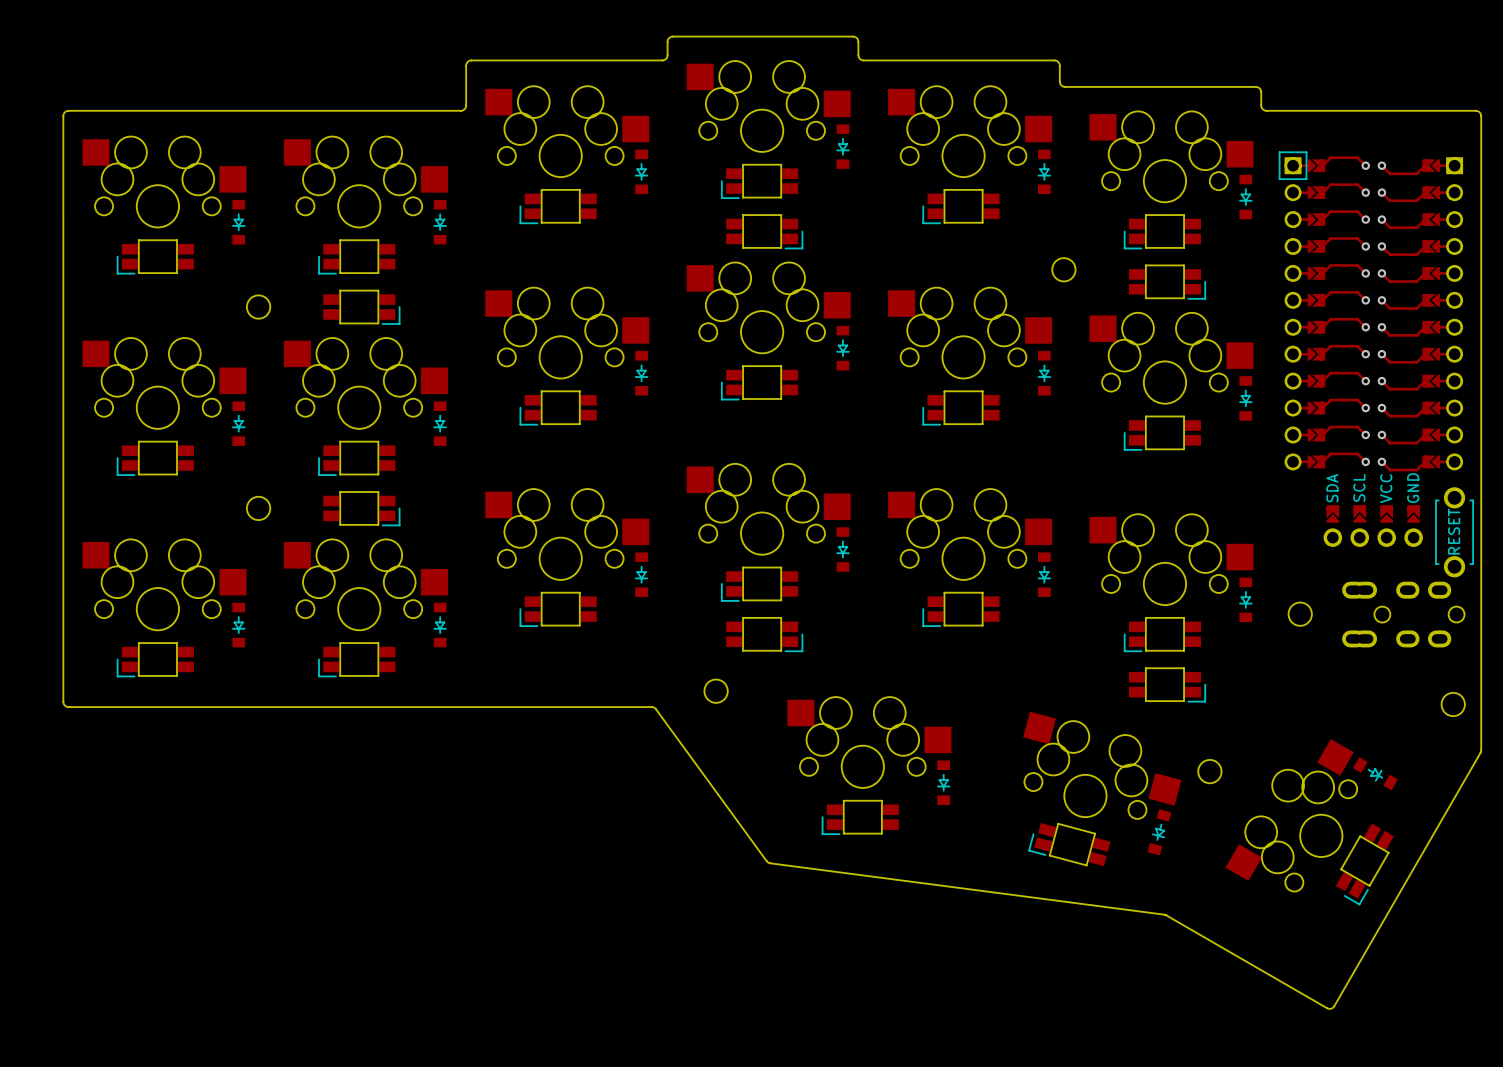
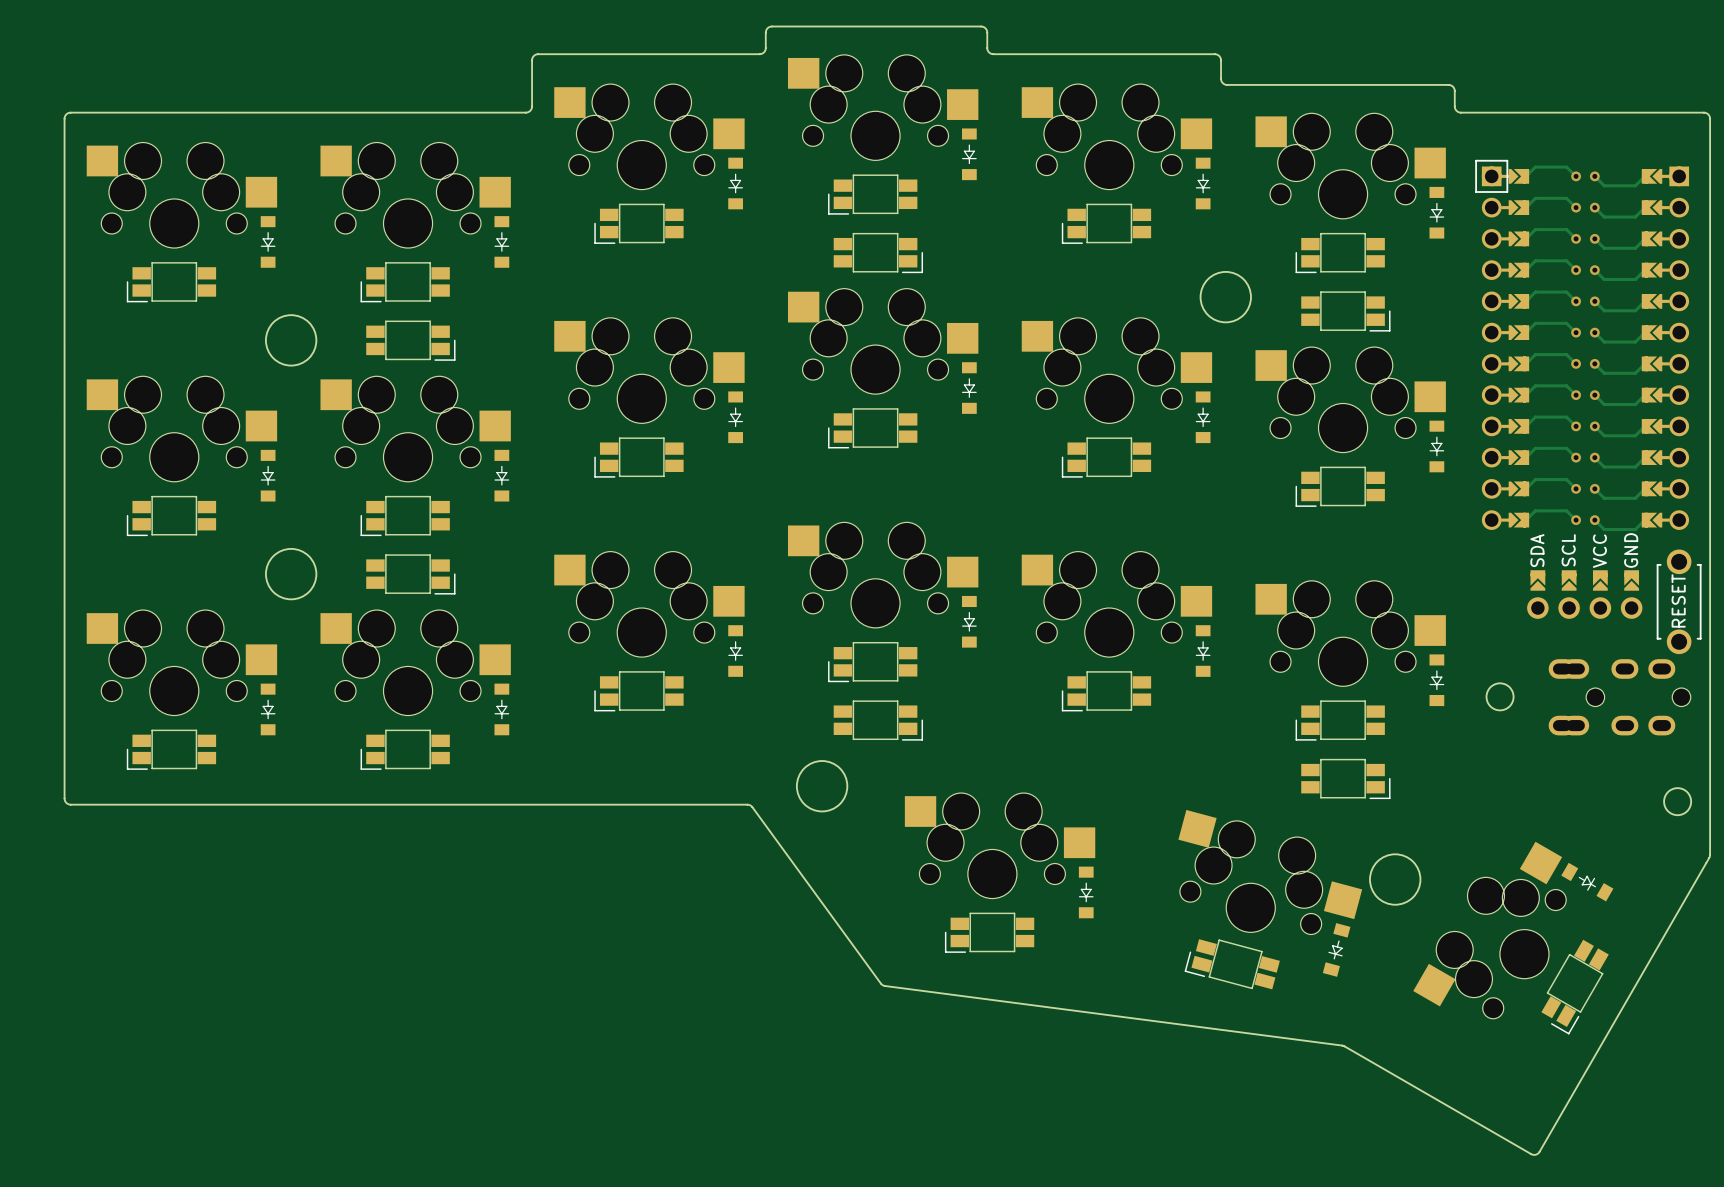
round board edge size: [1051, 257, 1077, 283] -> [1199, 270, 1252, 324]
round board edge size: [246, 294, 272, 320] -> [265, 314, 318, 367]
round board edge size: [246, 495, 272, 521] -> [265, 547, 318, 601]
round board edge size: [703, 678, 729, 704] -> [795, 760, 849, 813]
round board edge size: [1197, 759, 1223, 785] -> [1369, 853, 1422, 906]

